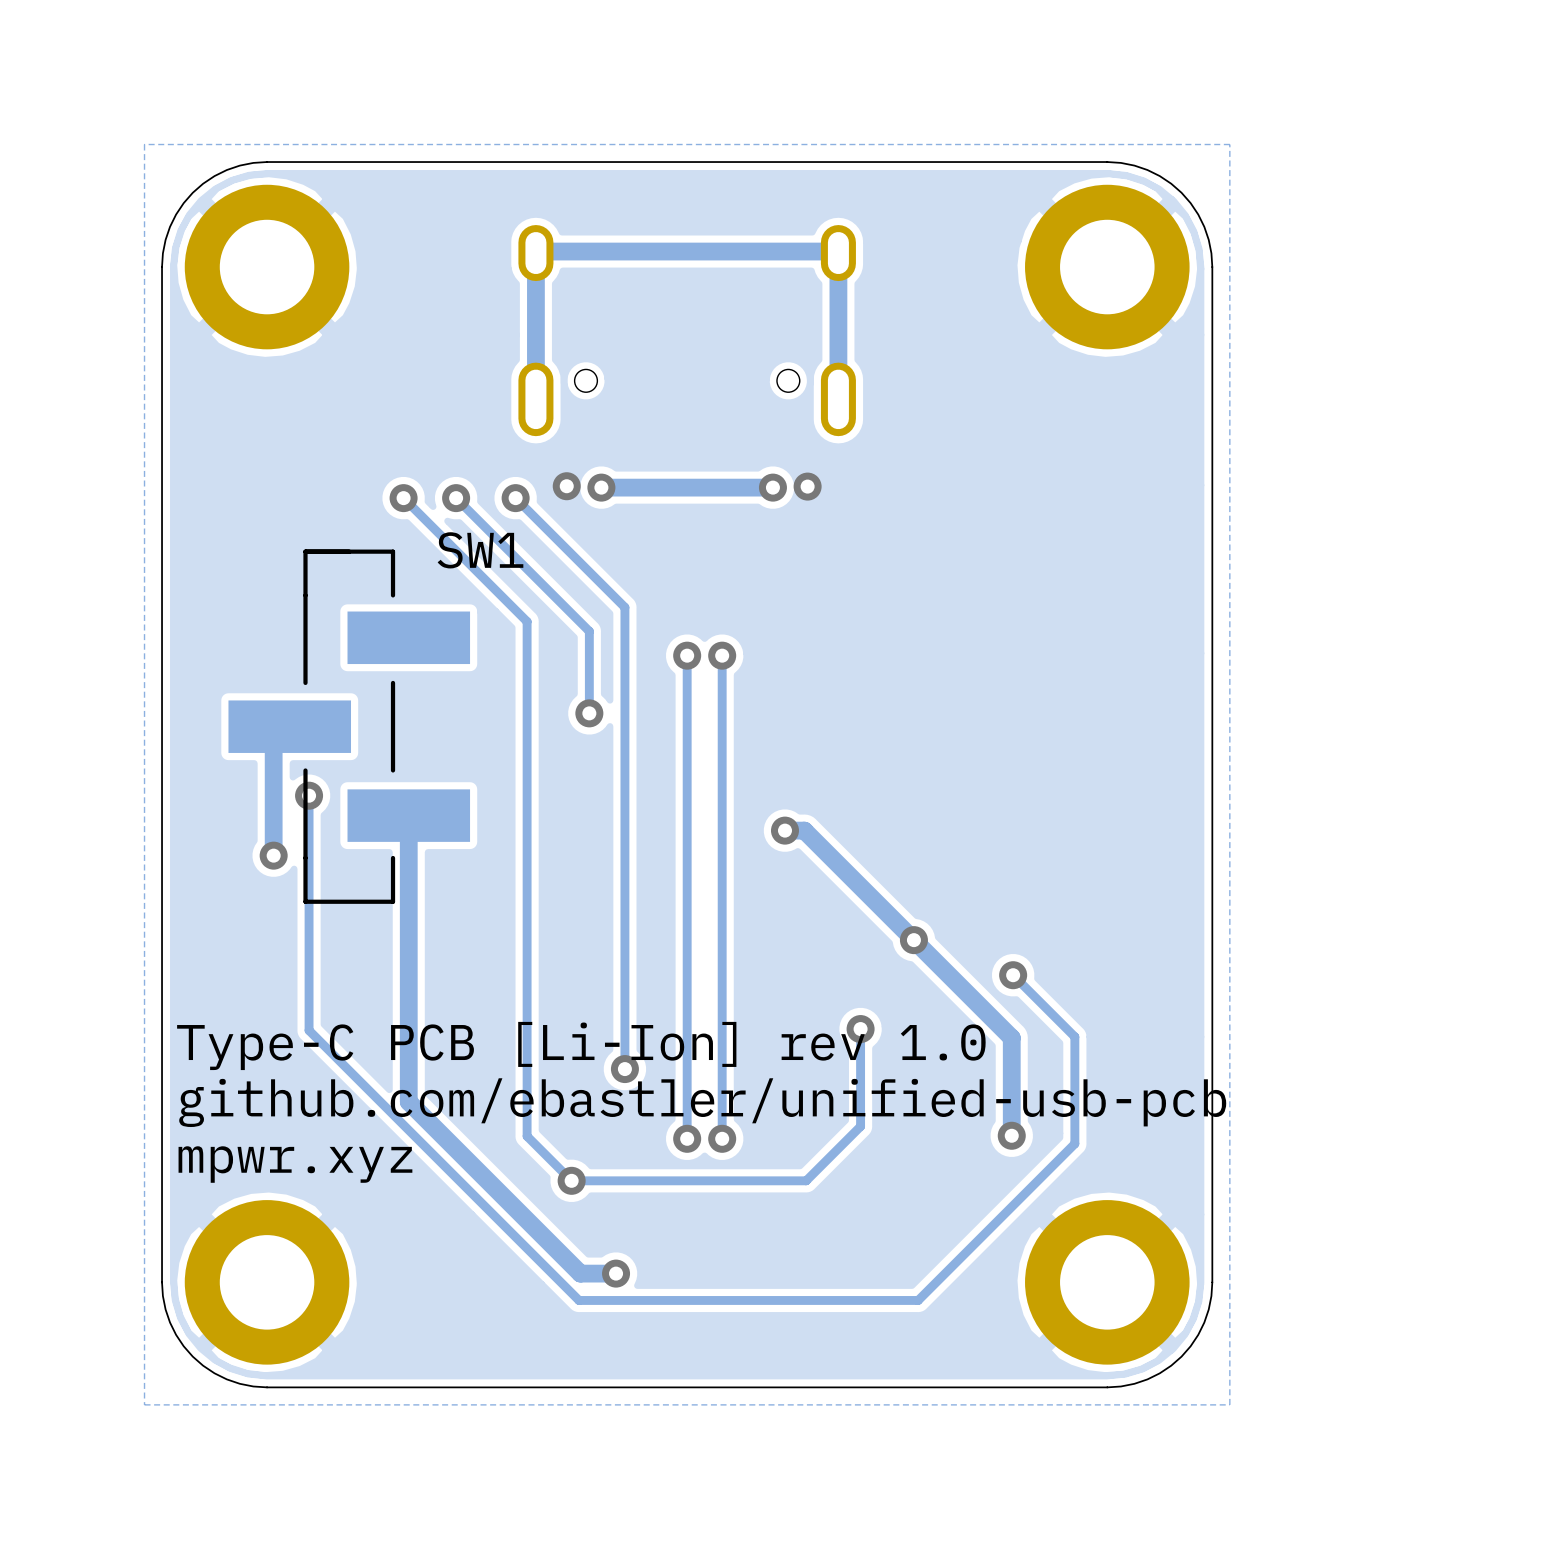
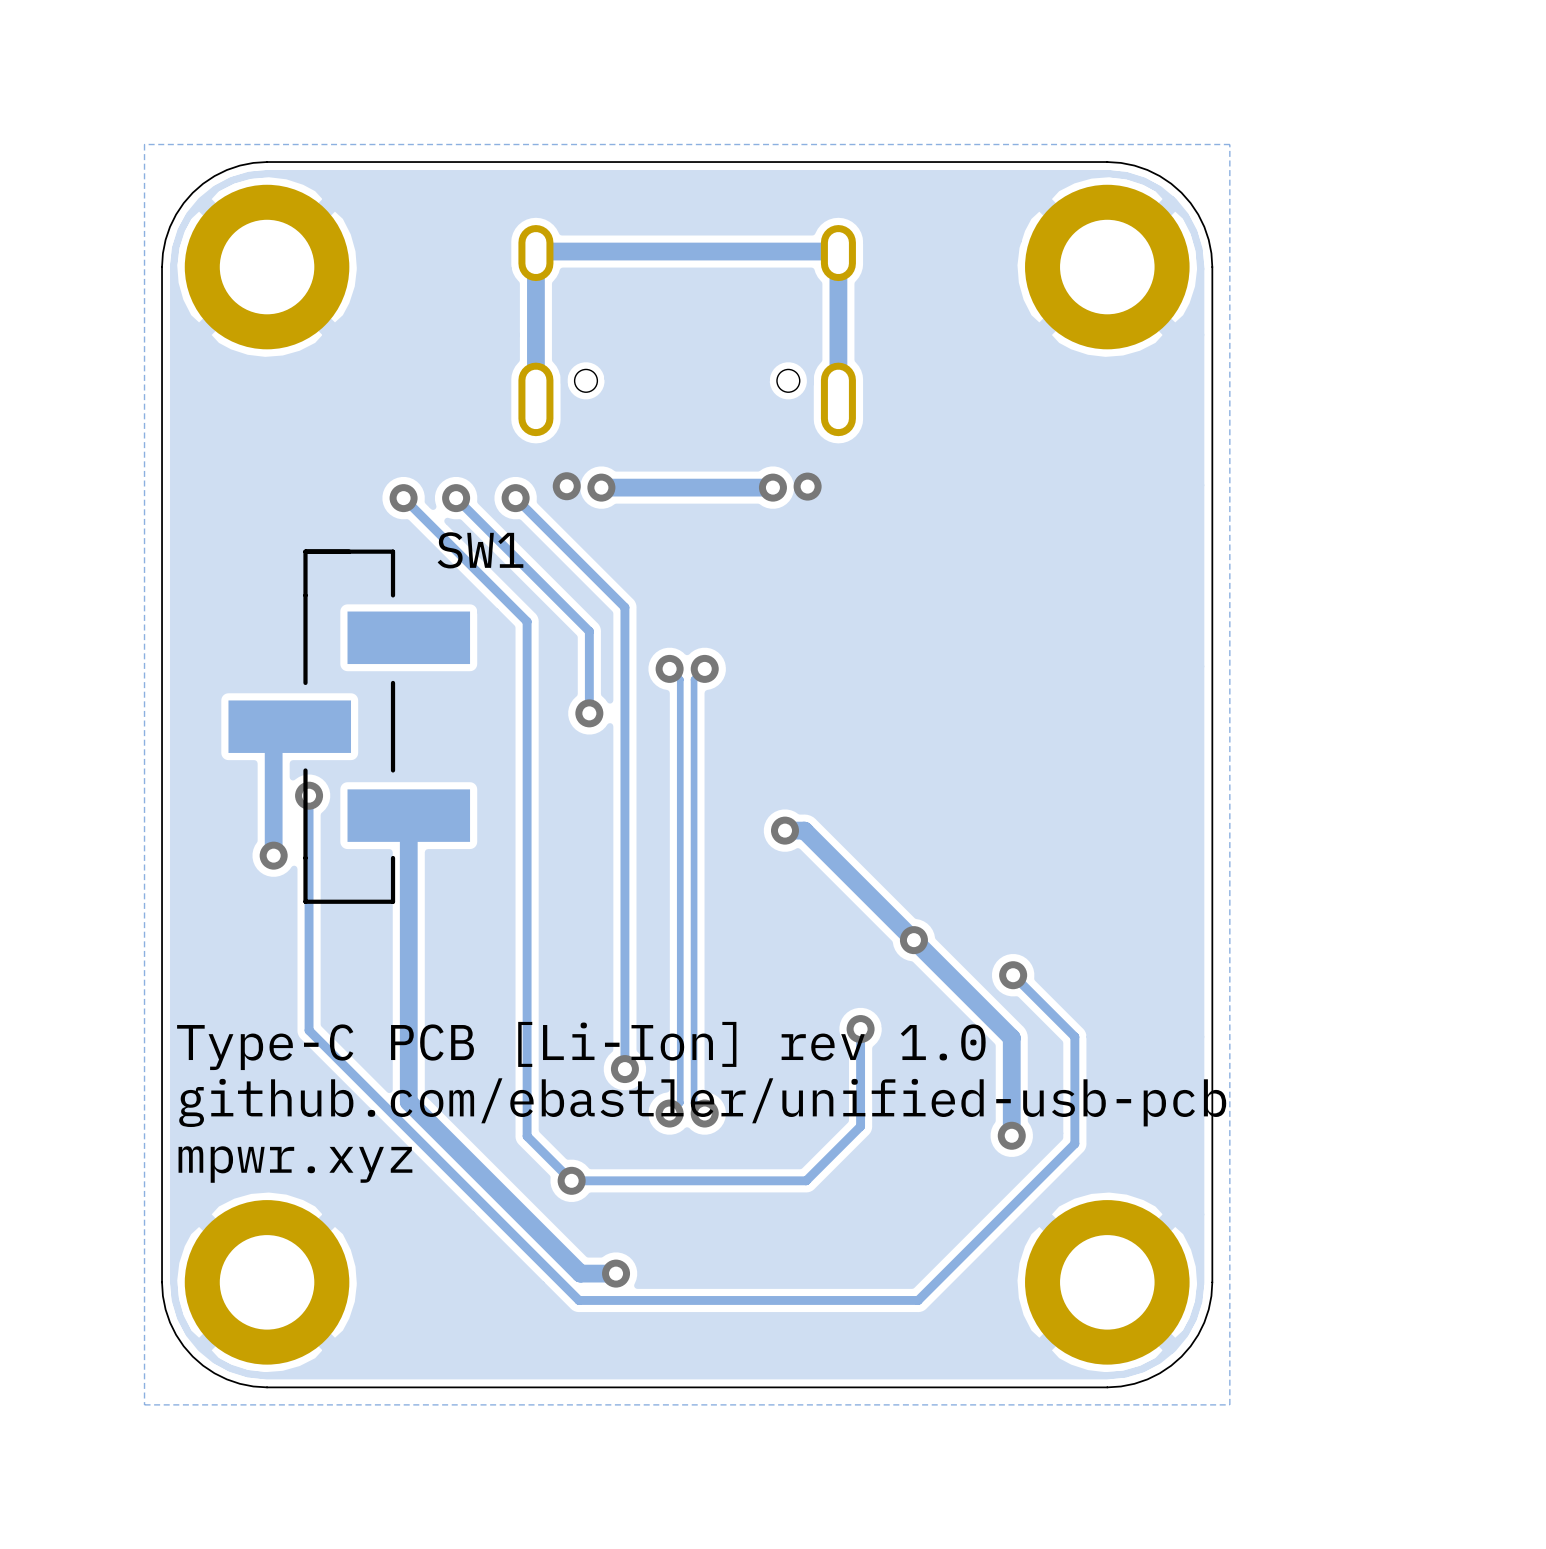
track: (687, 655) (687, 1138) -> none
via: (687, 655) -> none
track: (722, 655) (722, 1138) -> none
via: (722, 655) -> none
track: none -> (669, 668) (680, 679) (680, 1102) (669, 1113)
via: none -> (669, 668)
track: none -> (704, 668) (694, 679) (694, 1102) (704, 1113)
via: none -> (704, 668)
via: none -> (669, 1113)
via: none -> (704, 1113)
via: (687, 1138) -> none
via: (722, 1138) -> none

